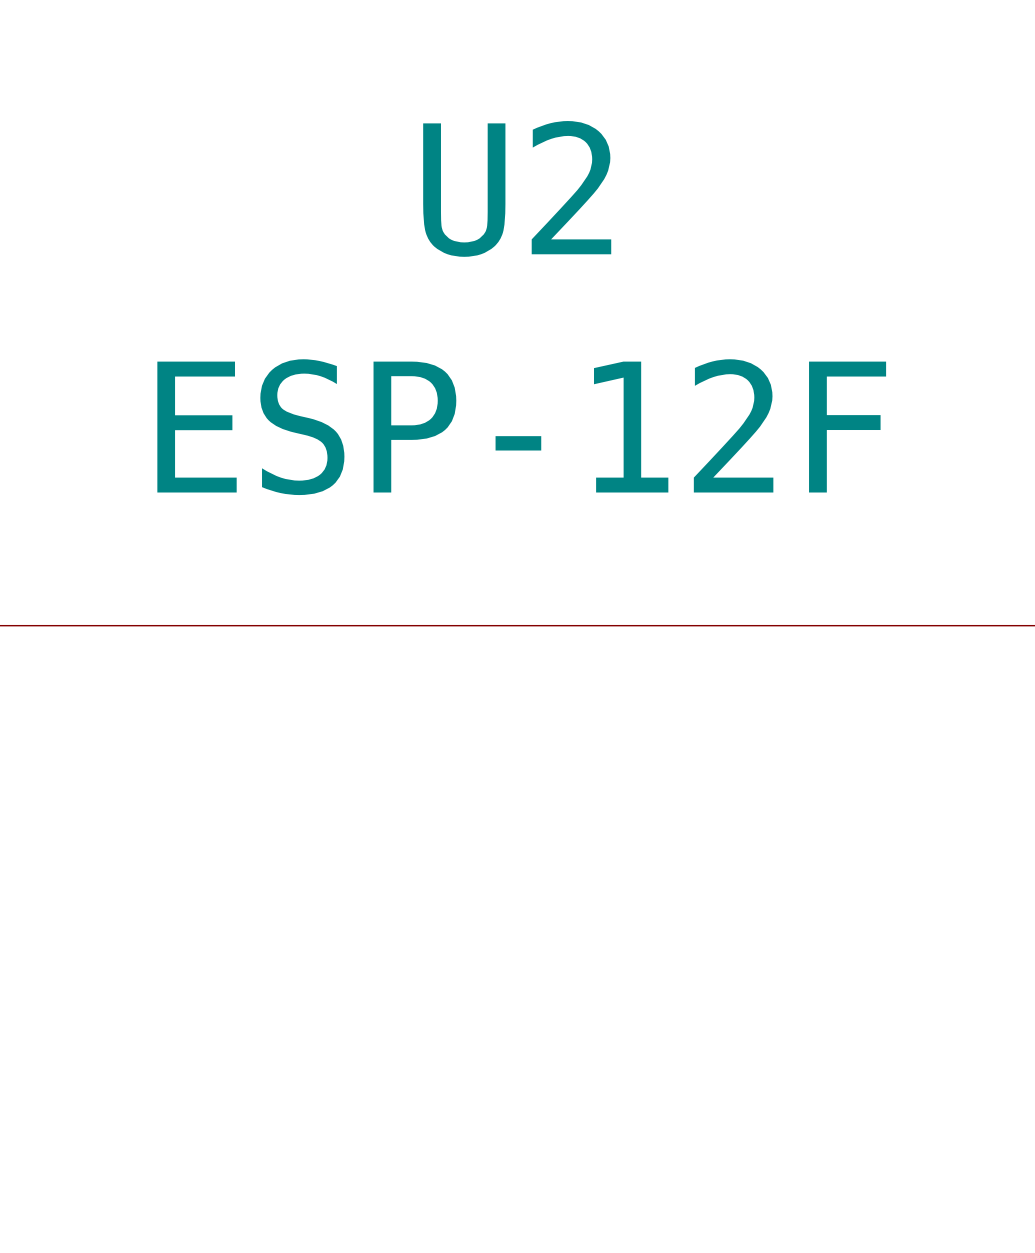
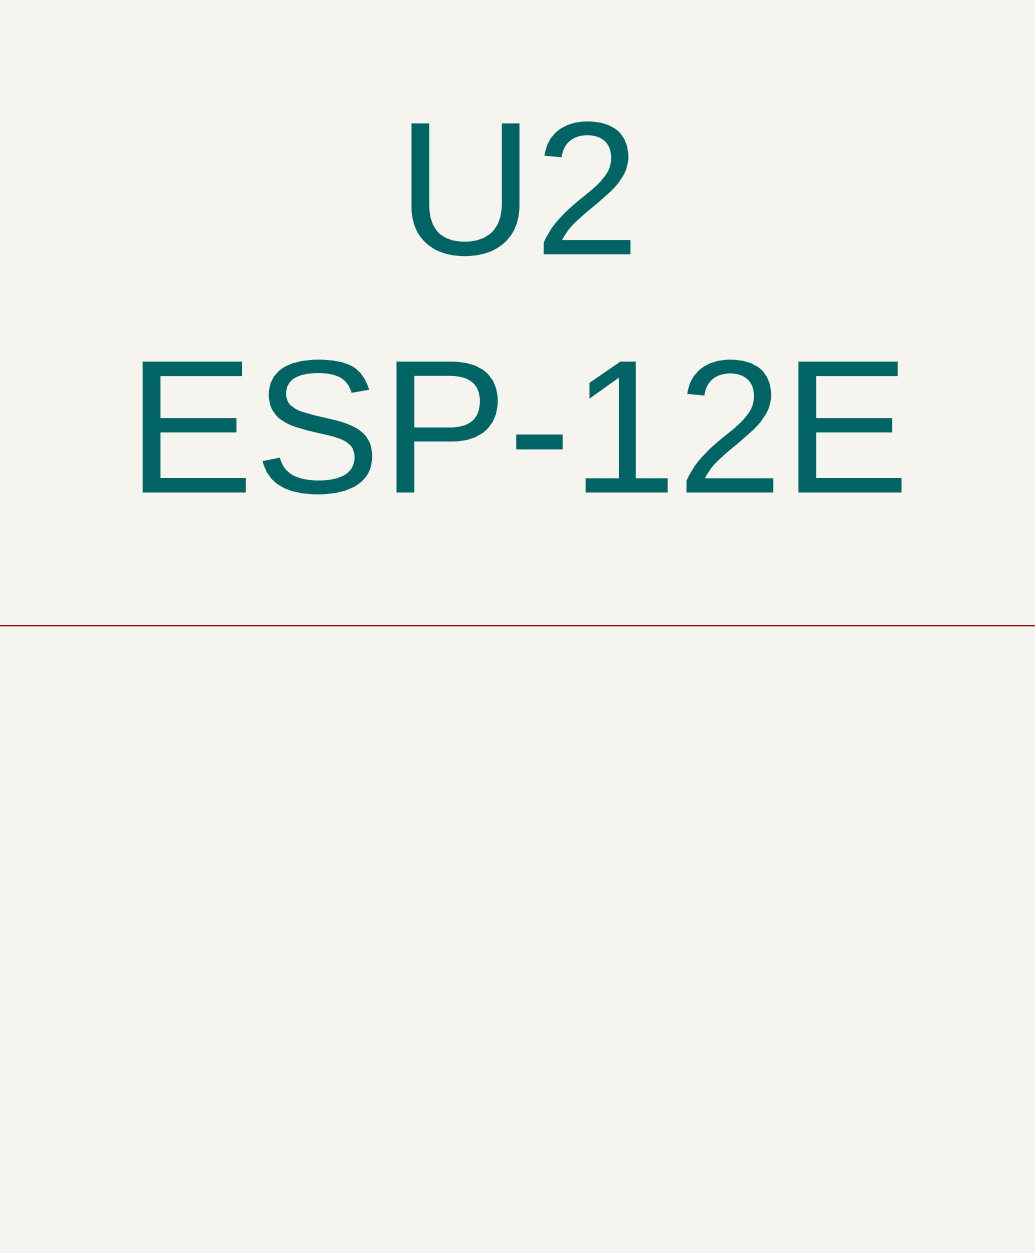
U2 value: ESP-12F (521, 427) -> ESP-12E (522, 427)

